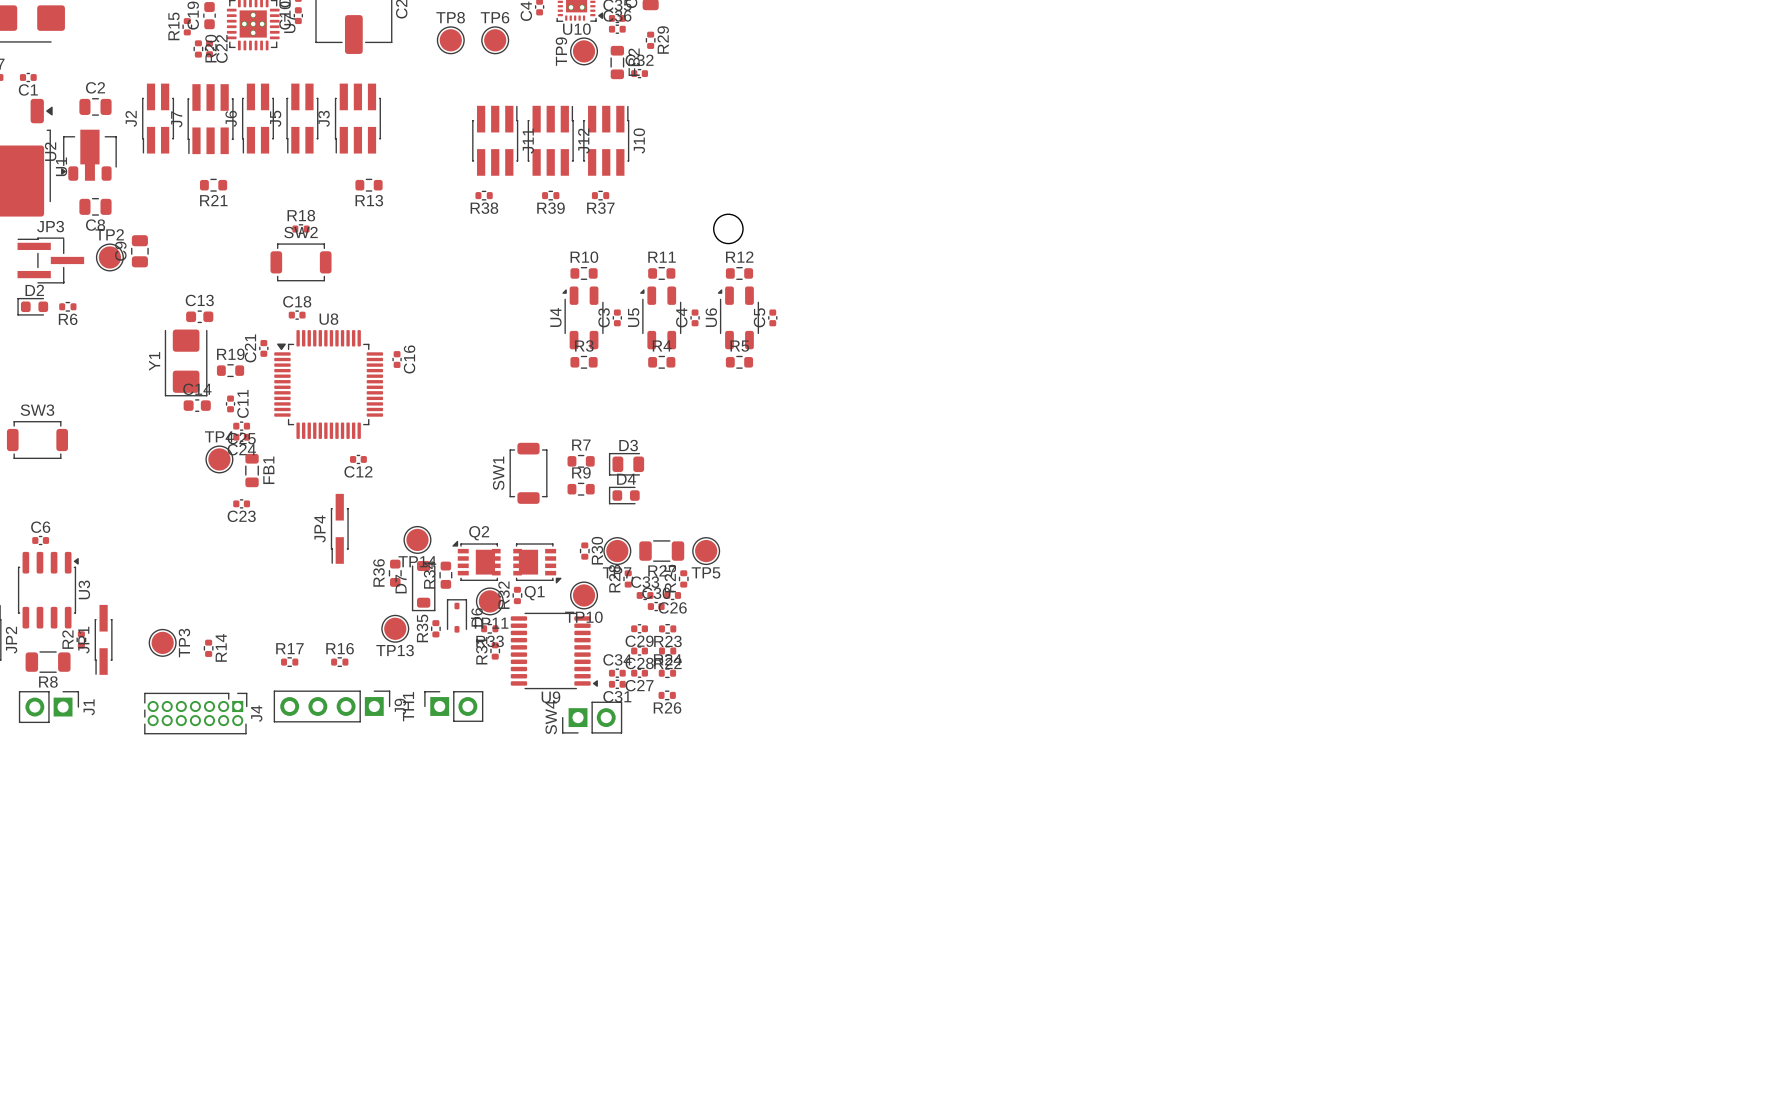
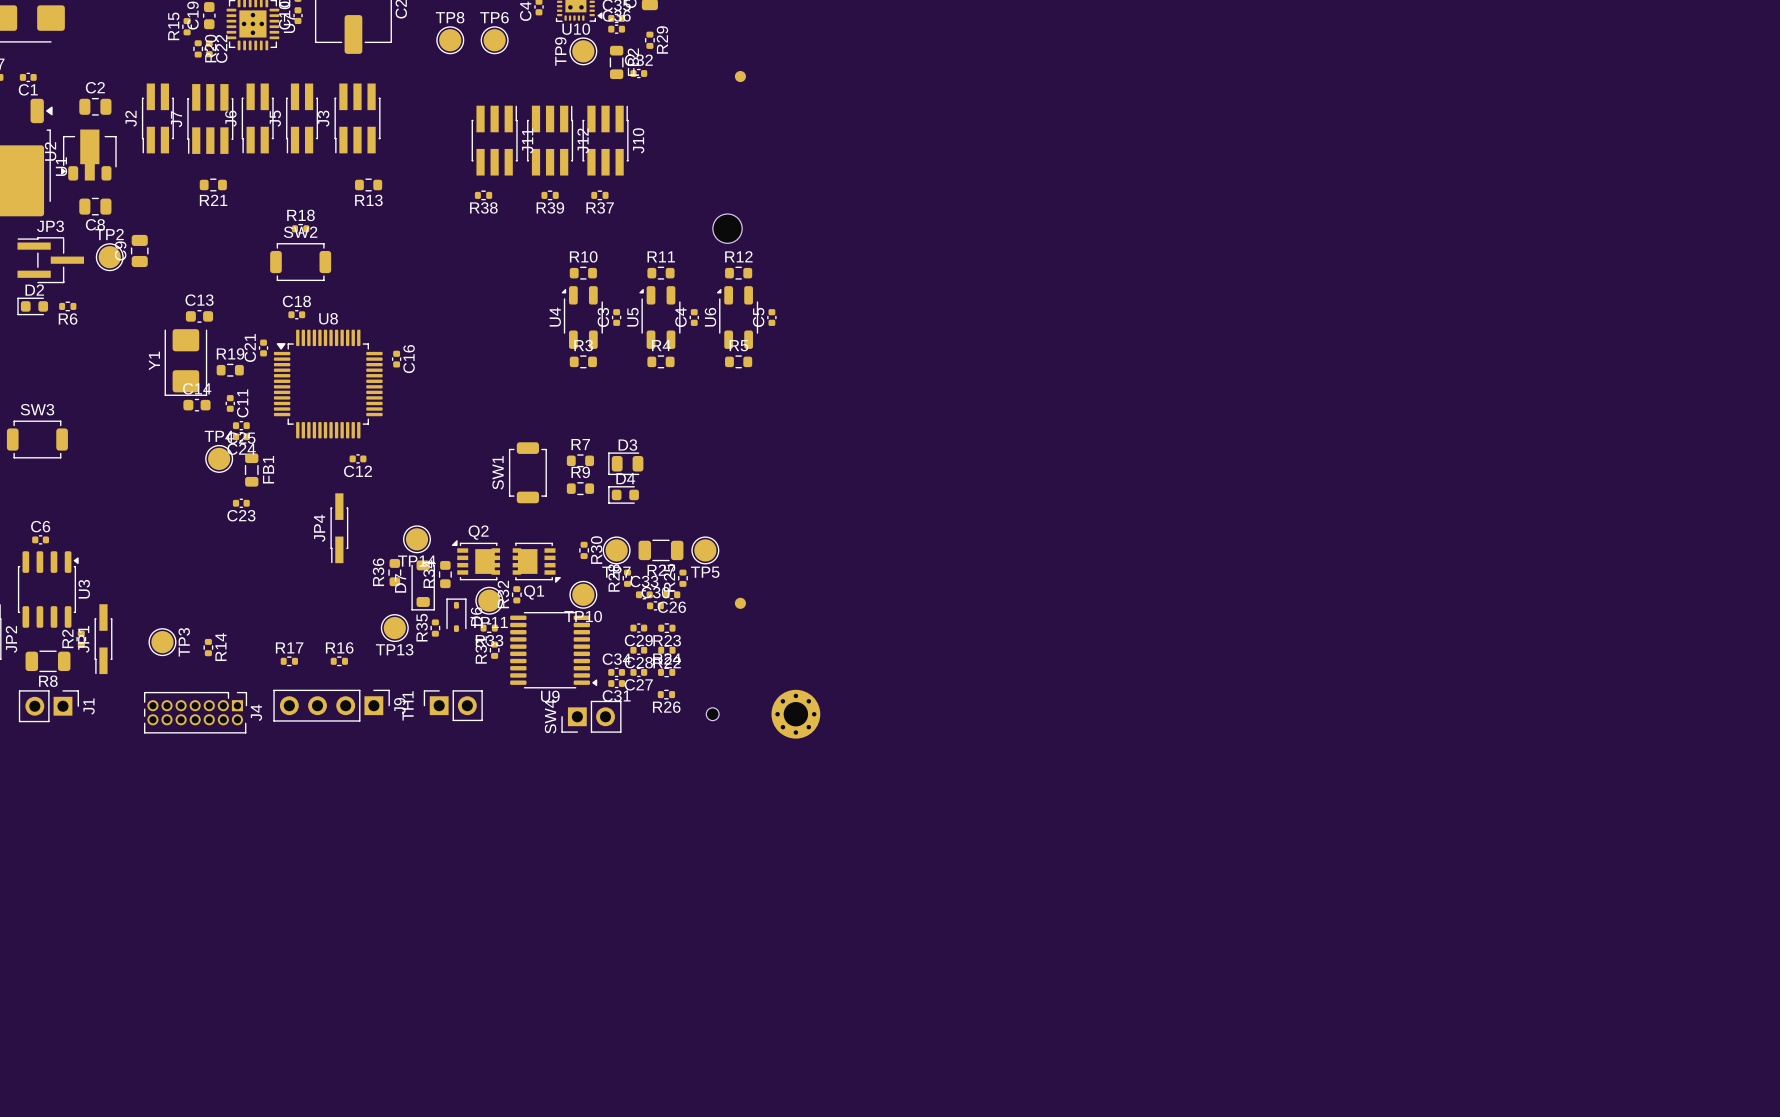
part: none -> (740, 76)
part: none -> (740, 603)
part: none -> (712, 714)
part: none -> (795, 714)

